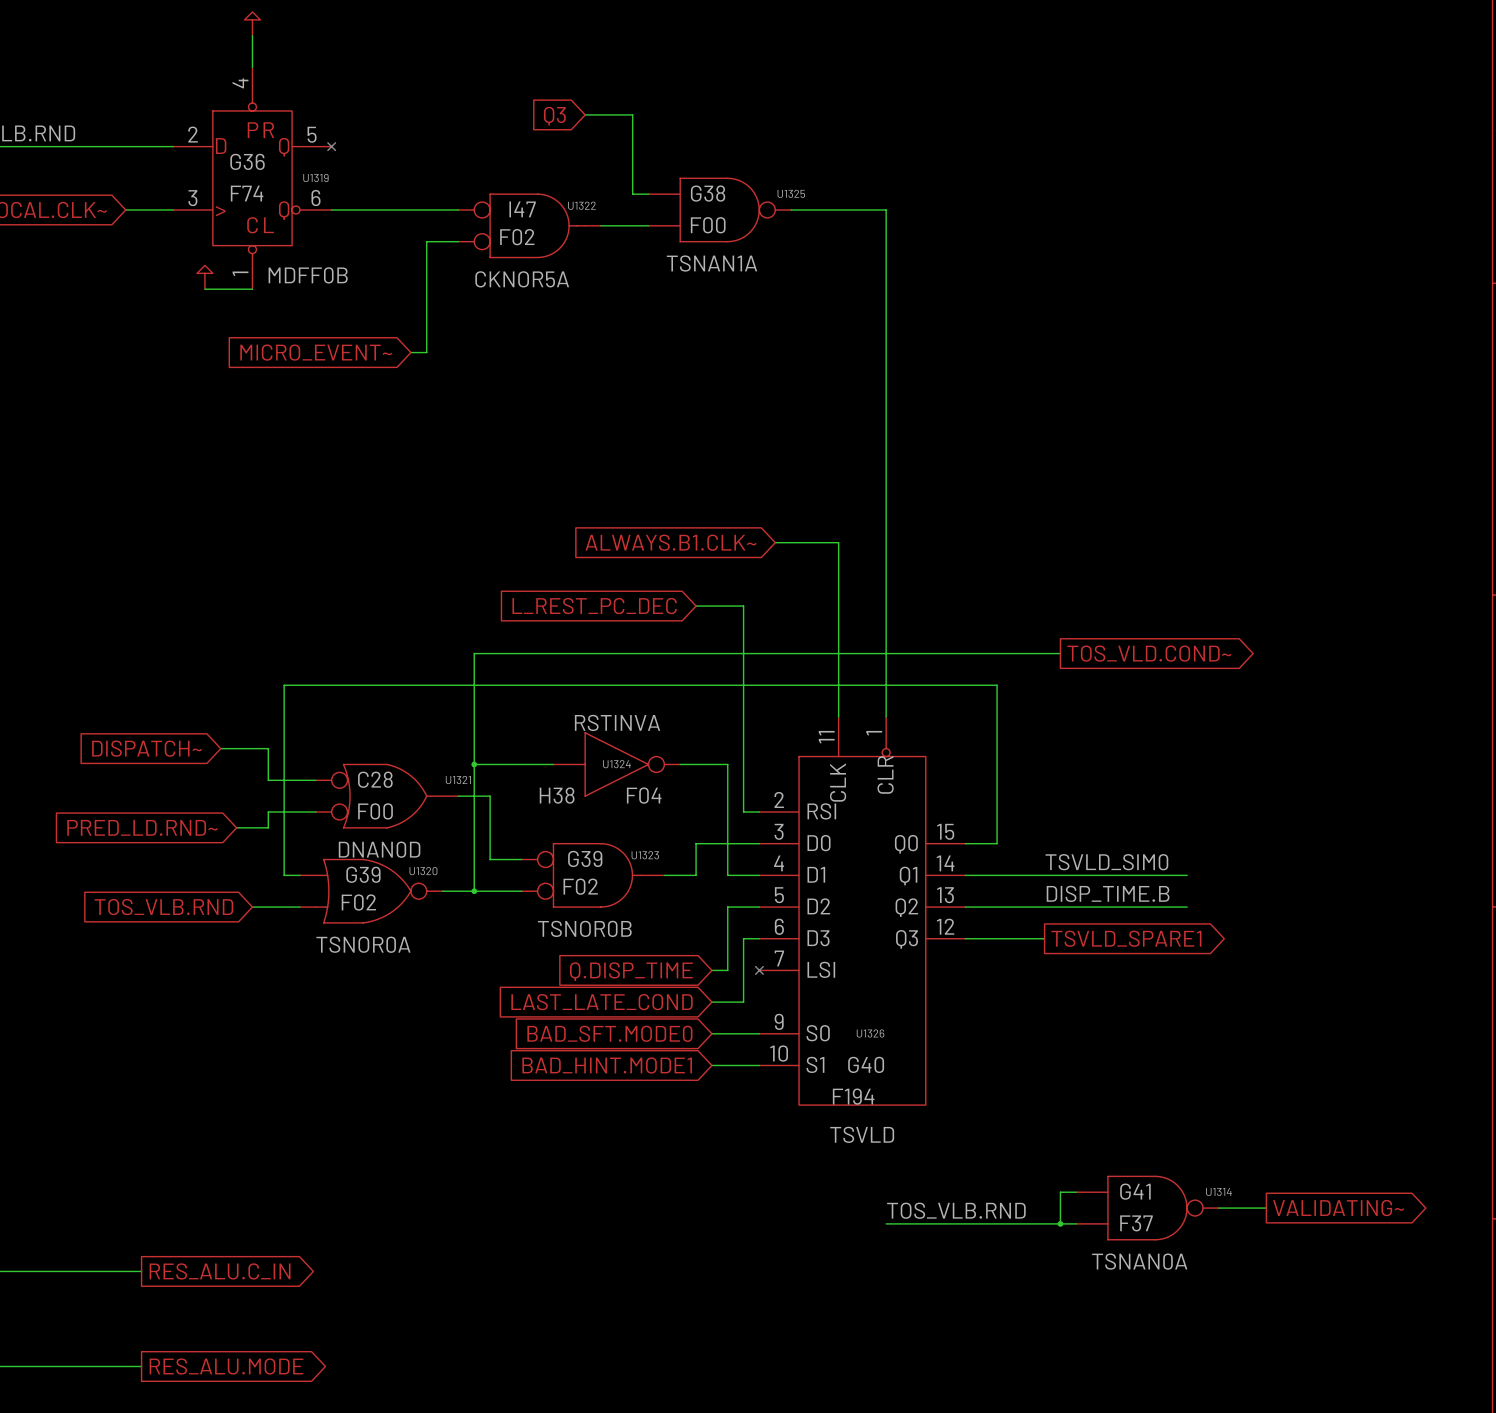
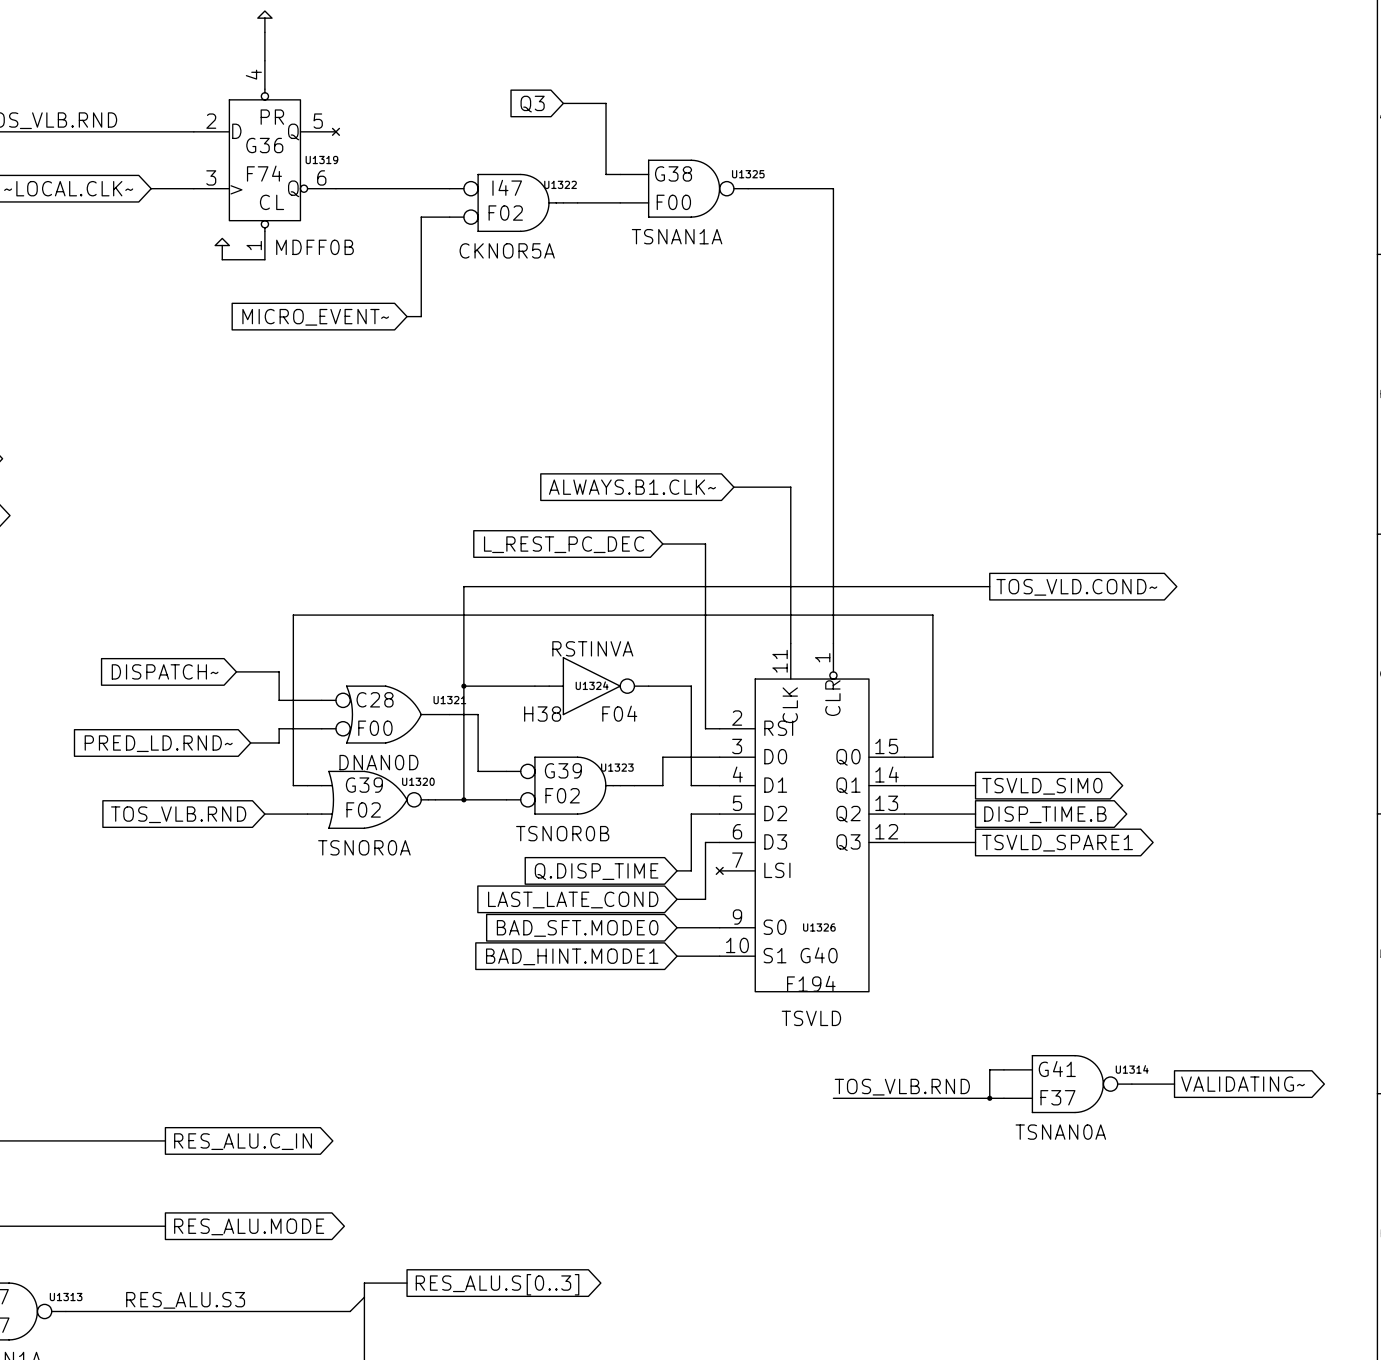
label: TSVLD_SIM0 (1106, 862) -> none
wire: (1044, 875) (1187, 875) -> none
global label: none -> TSVLD_SIM0 (1042, 786)
label: DISP_TIME.B (1108, 893) -> none
wire: (1044, 907) (1187, 907) -> none
global label: none -> DISP_TIME.B (1045, 814)

